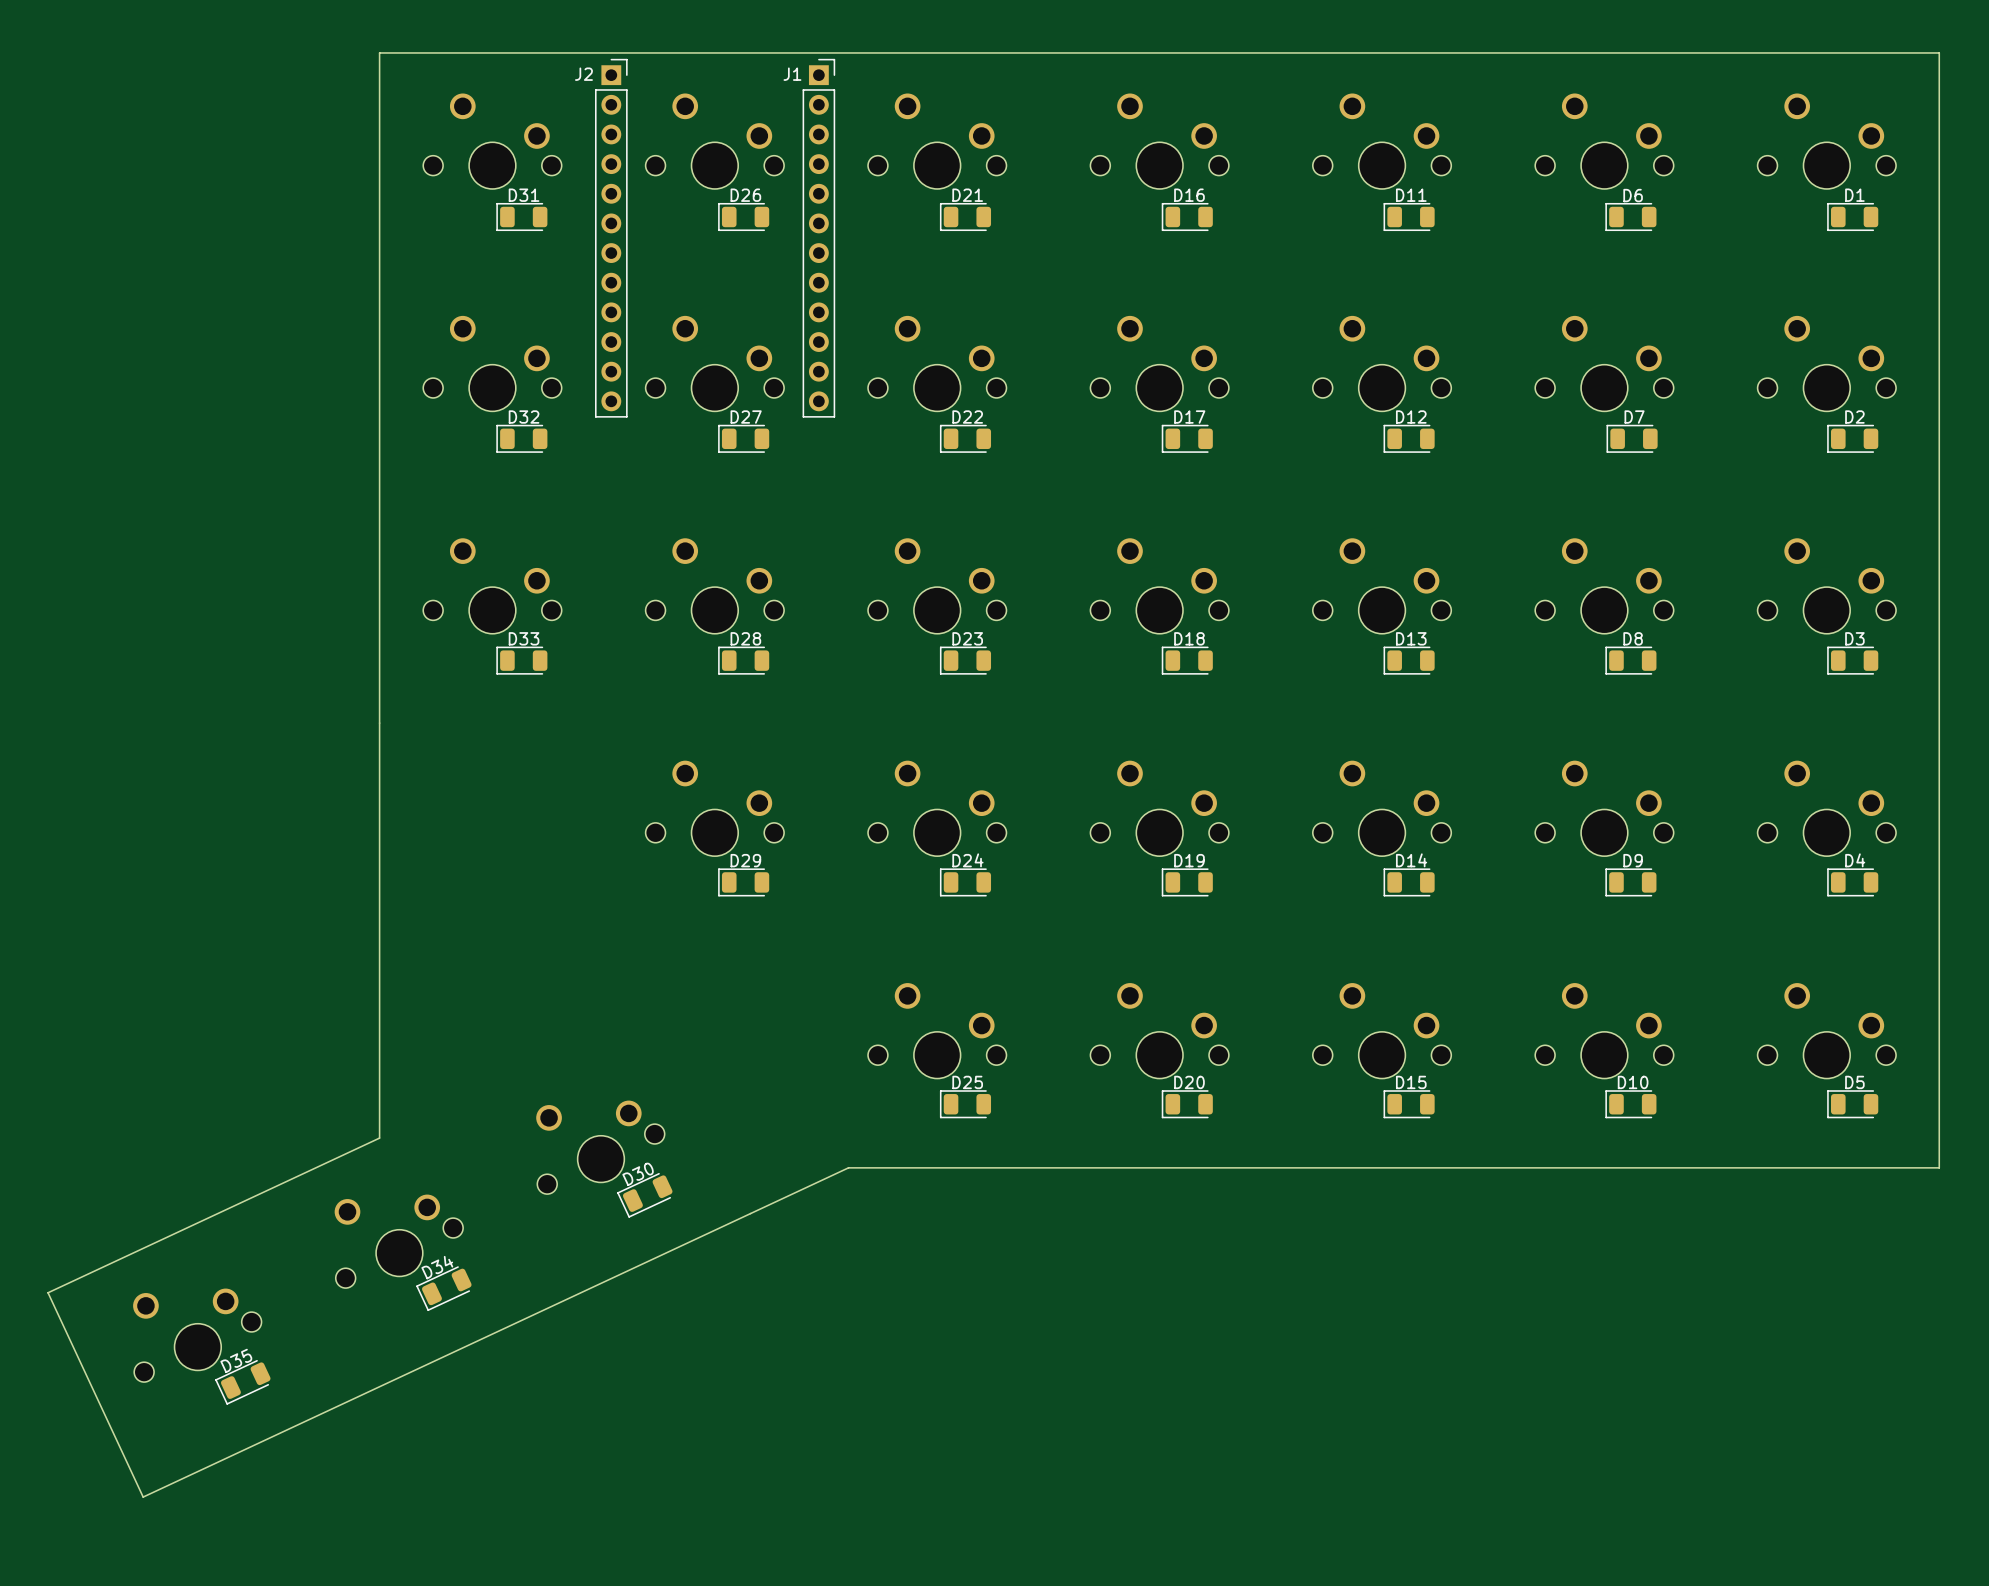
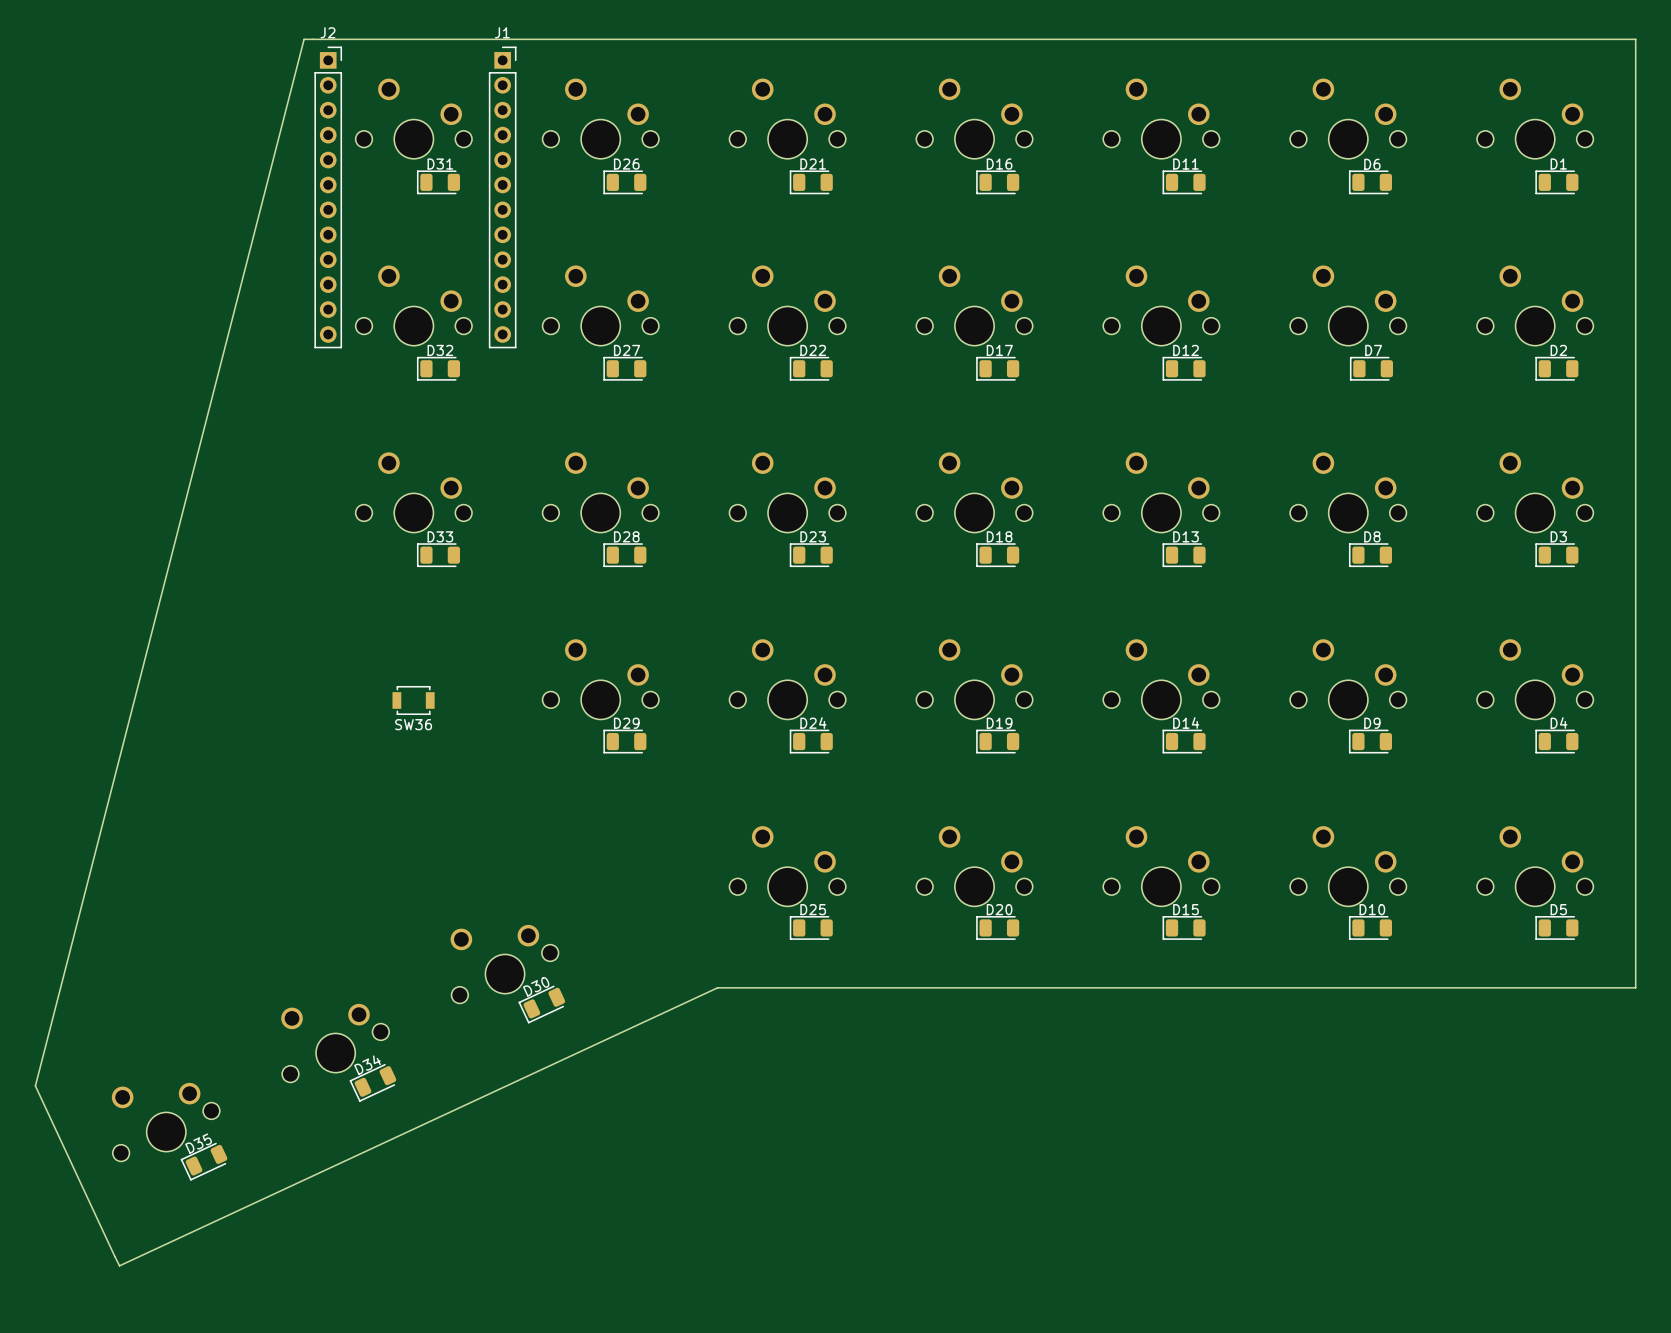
board edge: (1939, 52) (379, 52) (379, 1138) (48, 1292) (143, 1497) (848, 1167) (1939, 1167) (1939, 52) -> (1635, 39) (1635, 987) (717, 987) (119, 1265) (35, 1085) (304, 39) (1635, 39)
J2 name position: J2 (583, 74) -> J2 (327, 32)
J1 name position: J1 (792, 74) -> J1 (502, 32)
J2 position: (611, 238) -> (328, 197)
J1 position: (818, 238) -> (502, 197)
SW36: none -> (413, 700)

